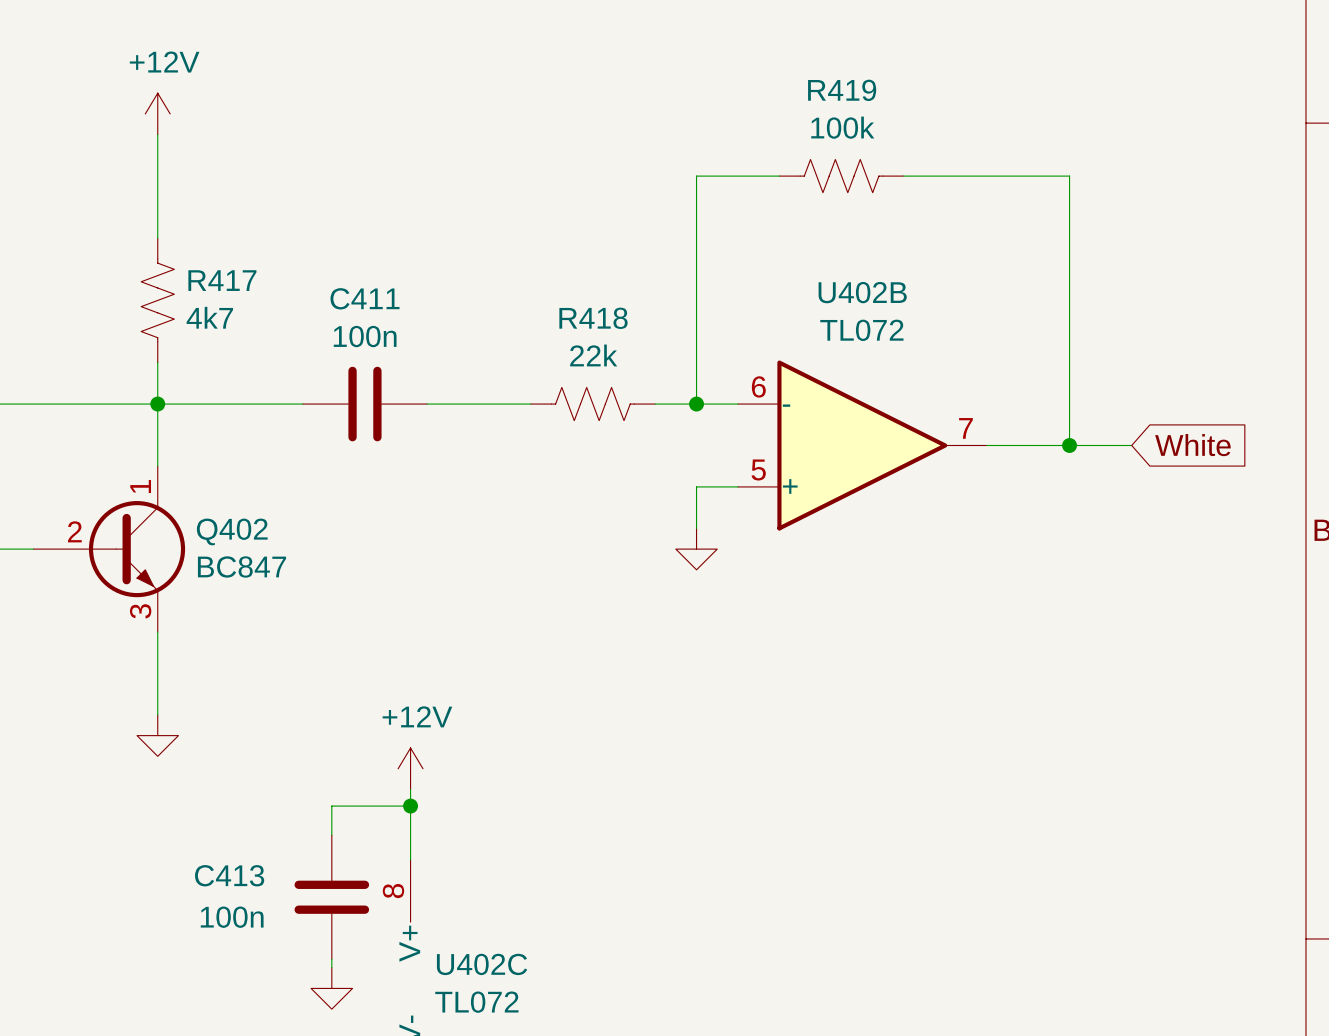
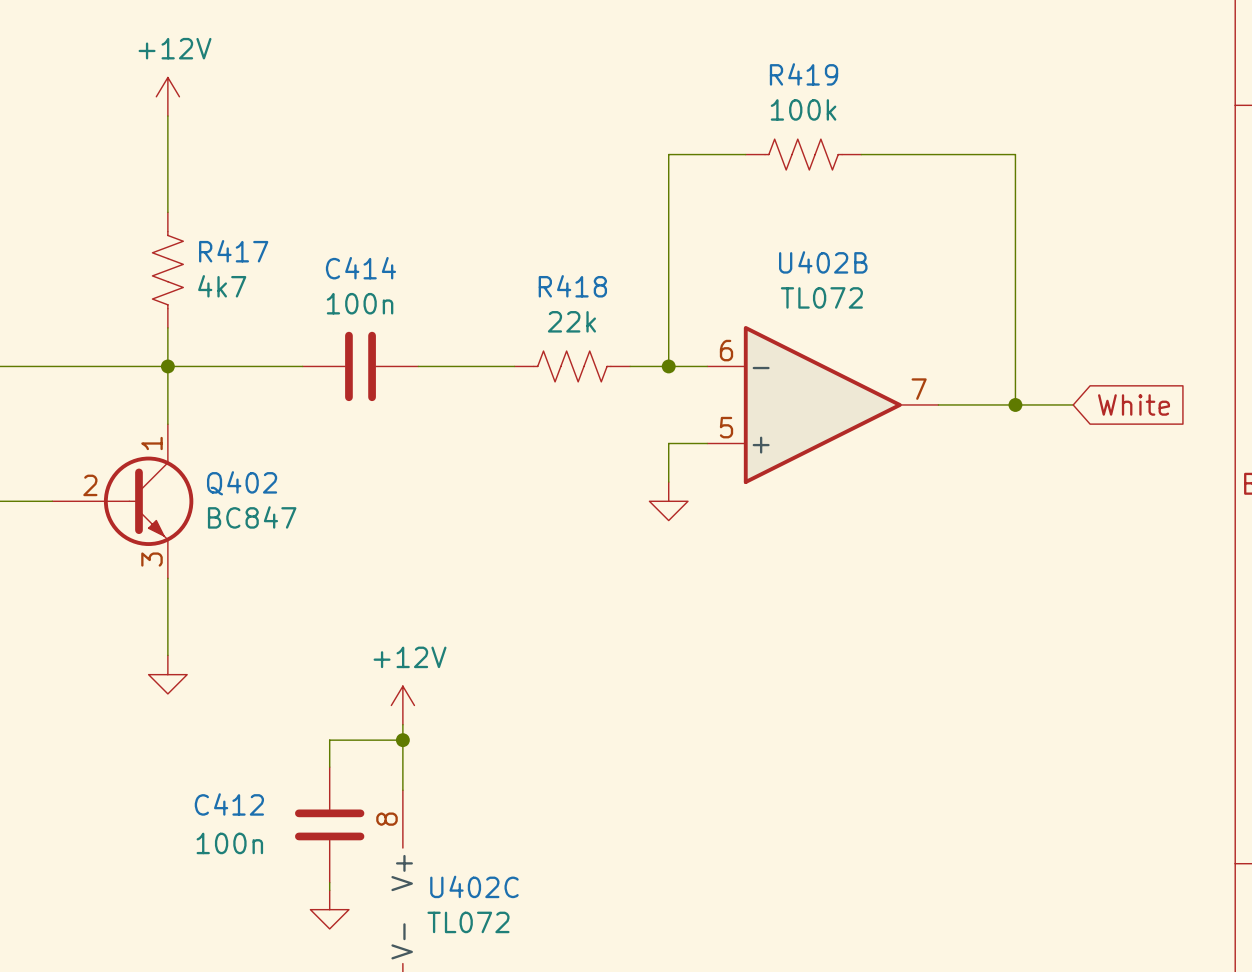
C411 name: C411 (365, 298) -> C414 (360, 268)
C413 name: C413 (229, 875) -> C412 (229, 804)

